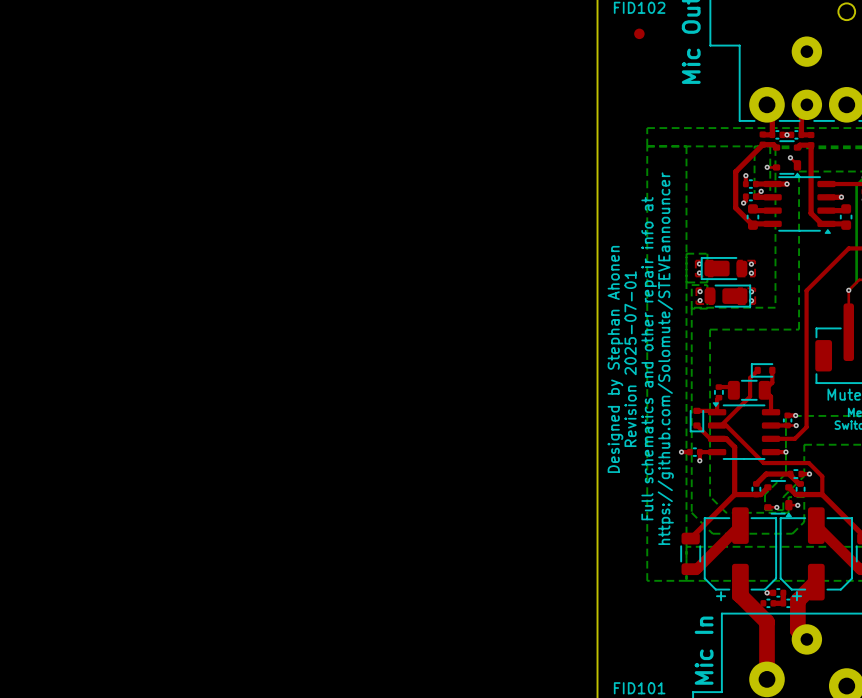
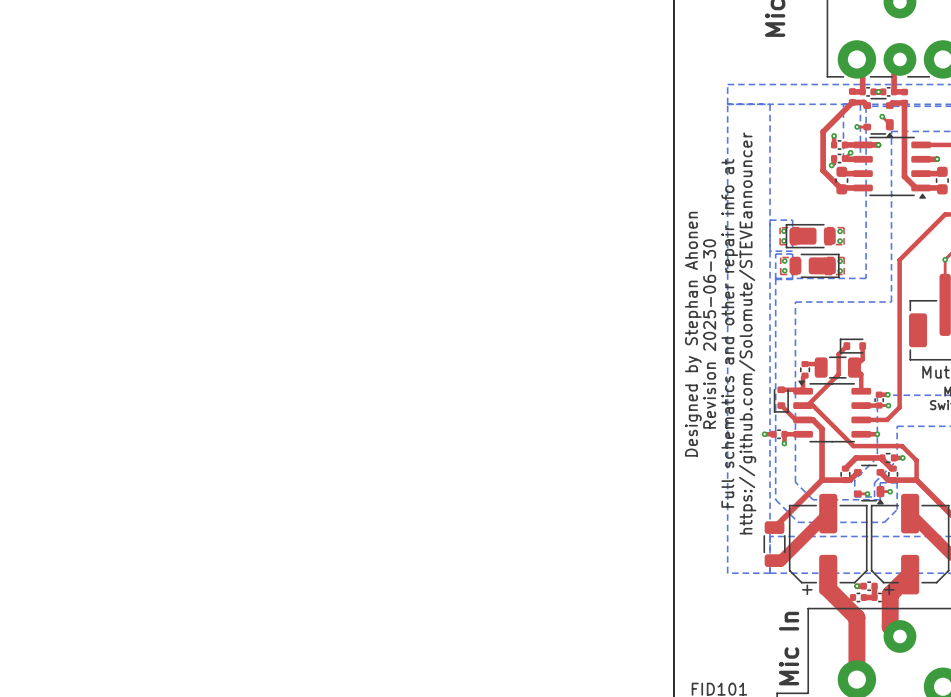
text: Revision 2025-07-01 (630, 359) -> Revision 2025-06-30 (709, 333)

